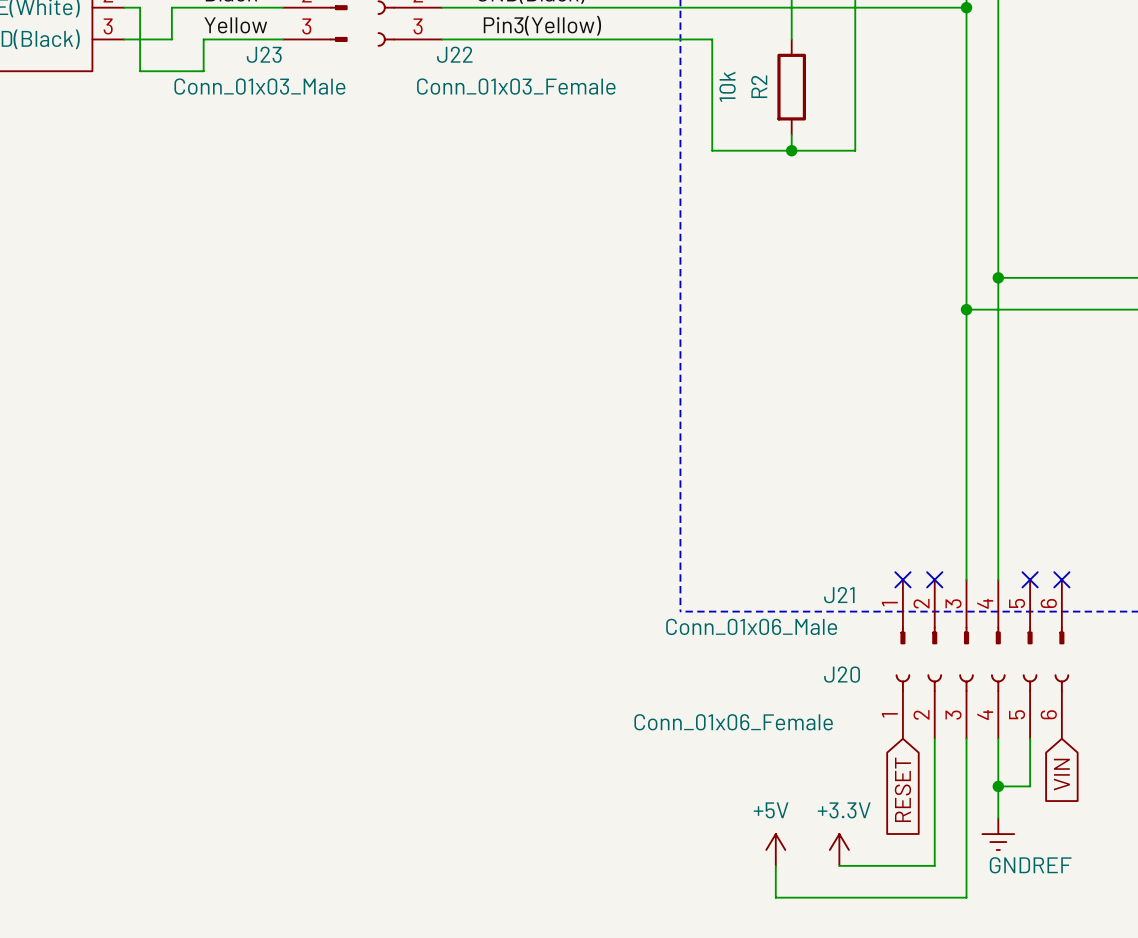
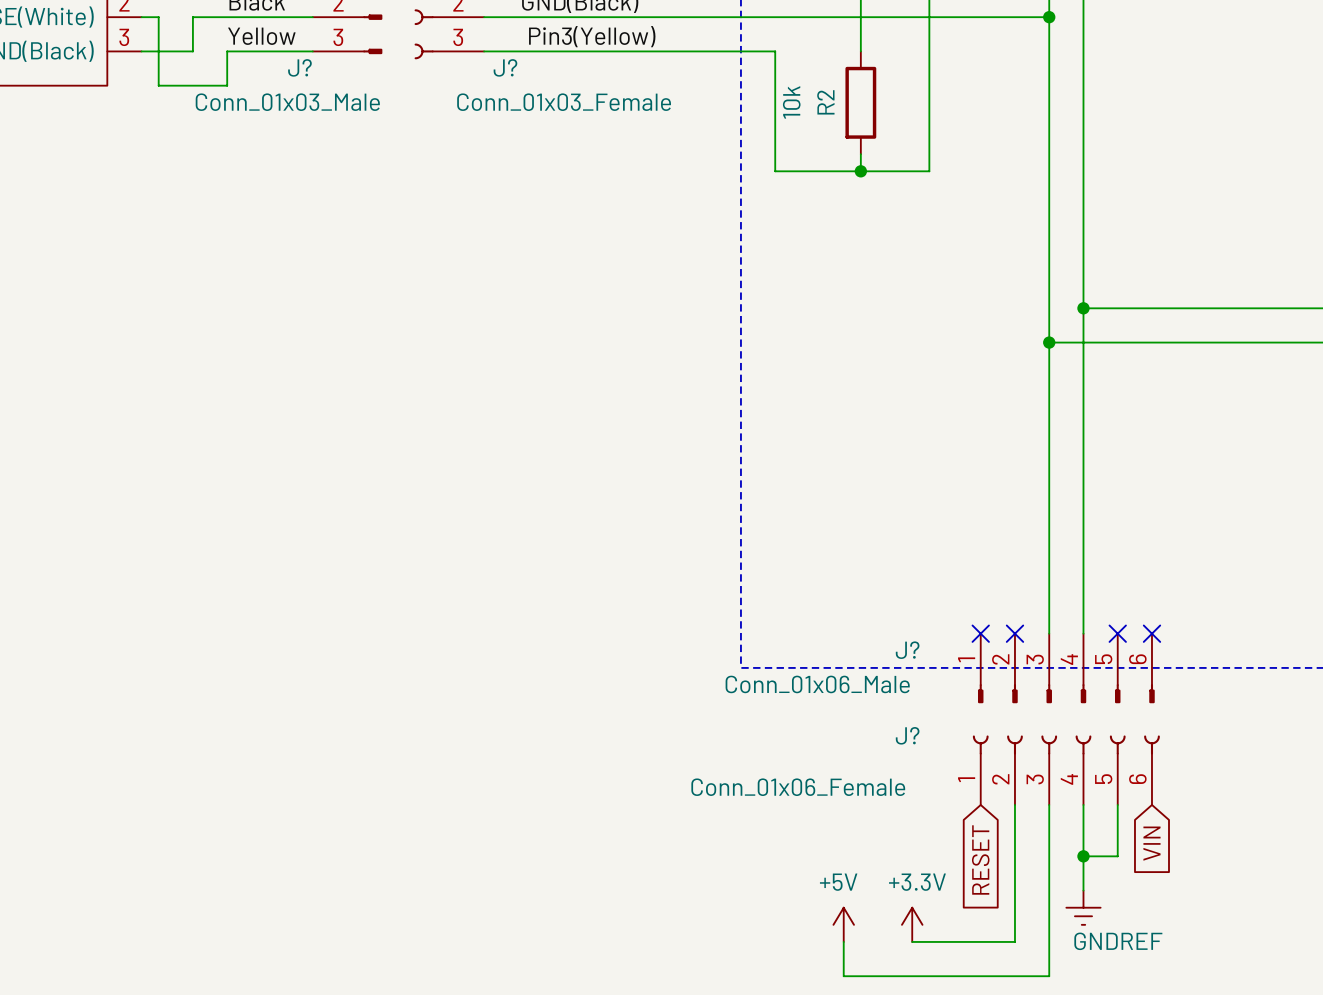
J23 name: J23 (264, 54) -> J? (299, 67)
J22 name: J22 (454, 54) -> J? (505, 67)
J21 name: J21 (839, 595) -> J? (907, 650)
J20 name: J20 (842, 674) -> J? (907, 735)

